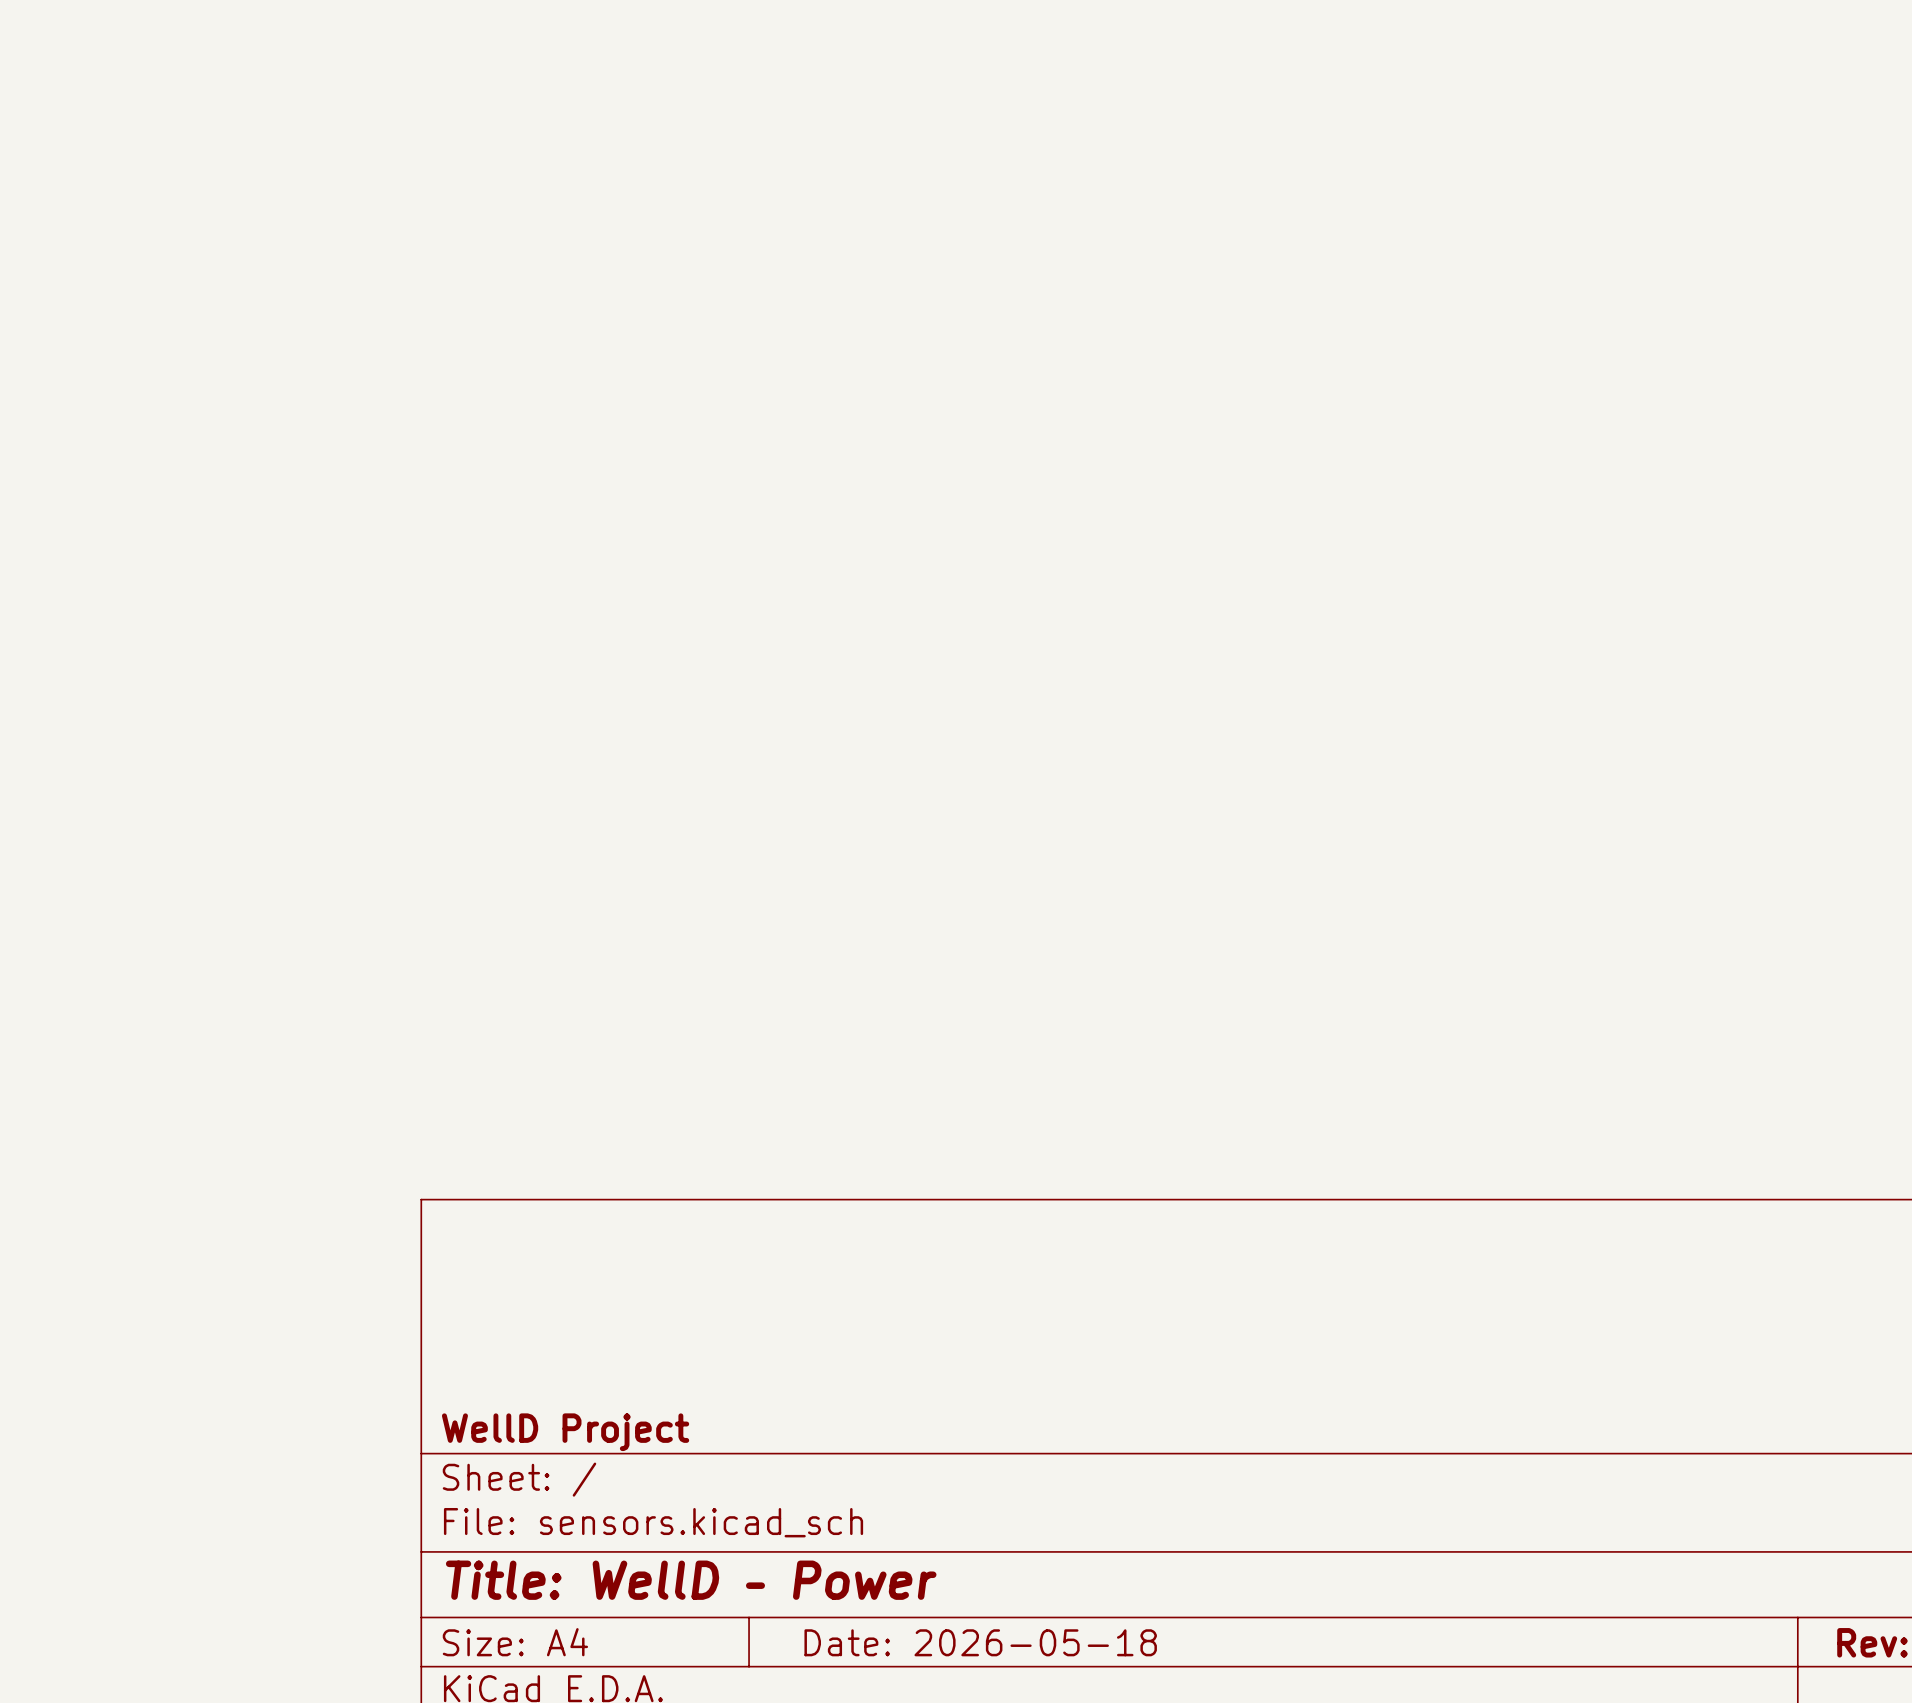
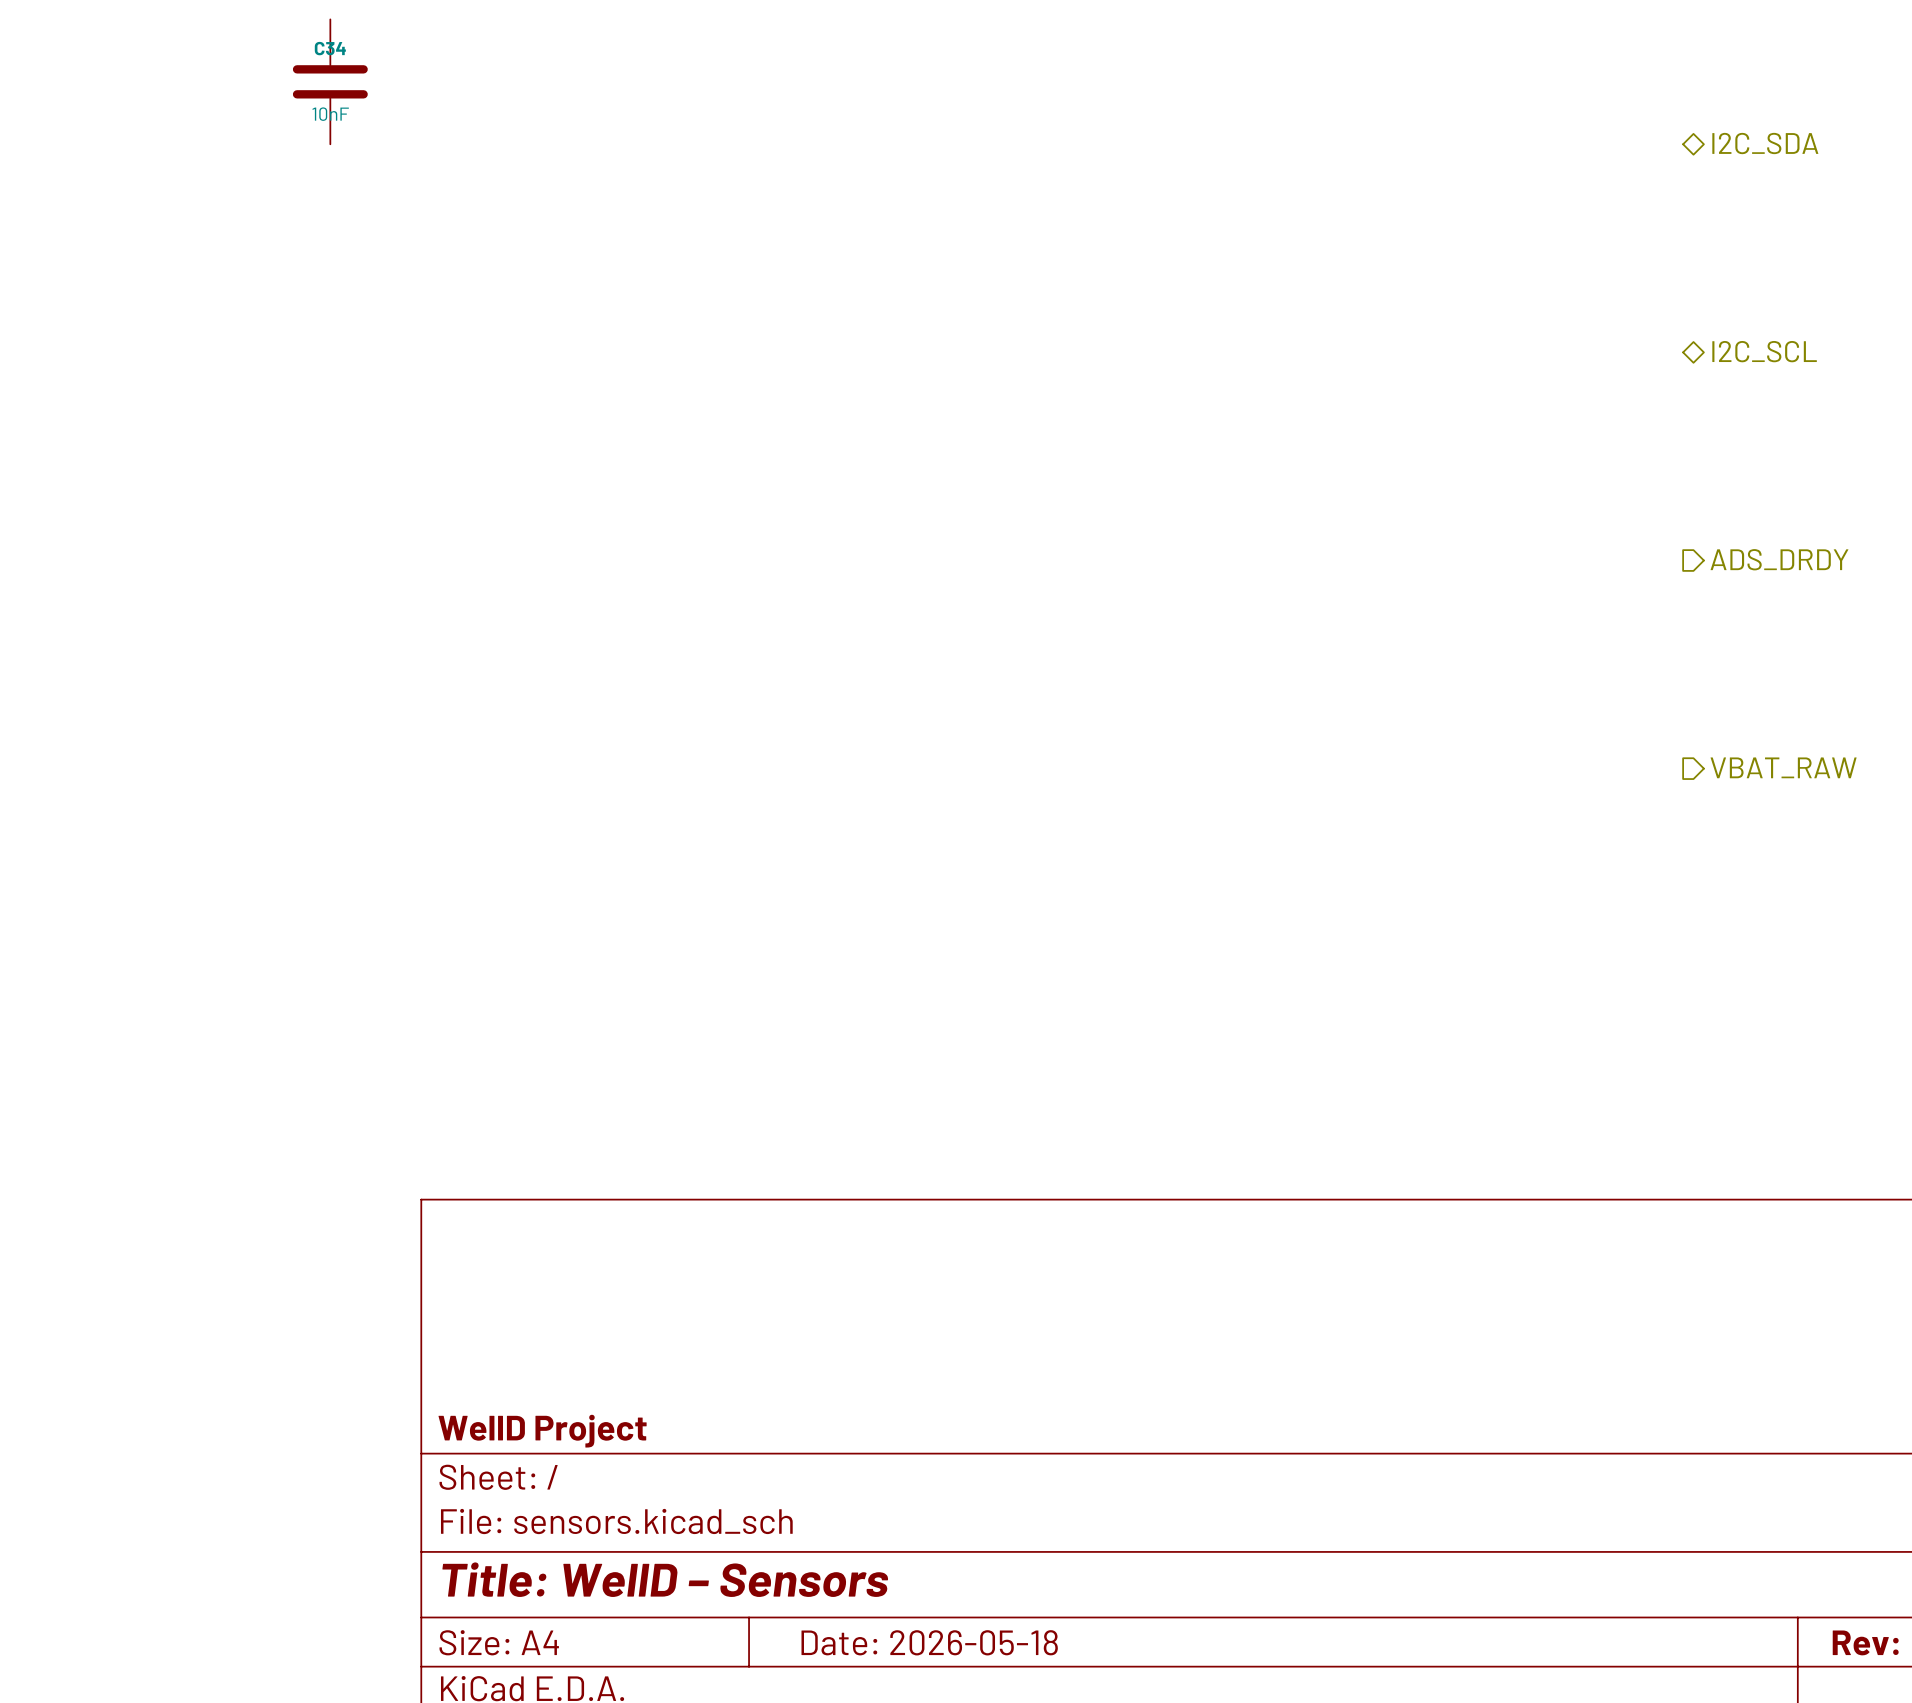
C34: none -> 10nF (330, 81)
hierarchical label: none -> I2C_SDA (1765, 143)
hierarchical label: none -> I2C_SCL (1764, 351)
hierarchical label: none -> ADS_DRDY (1779, 559)
hierarchical label: none -> VBAT_RAW (1783, 767)
title block: Title: WellD – Power (691, 1580) -> Title: WellD – Sensors (665, 1579)

